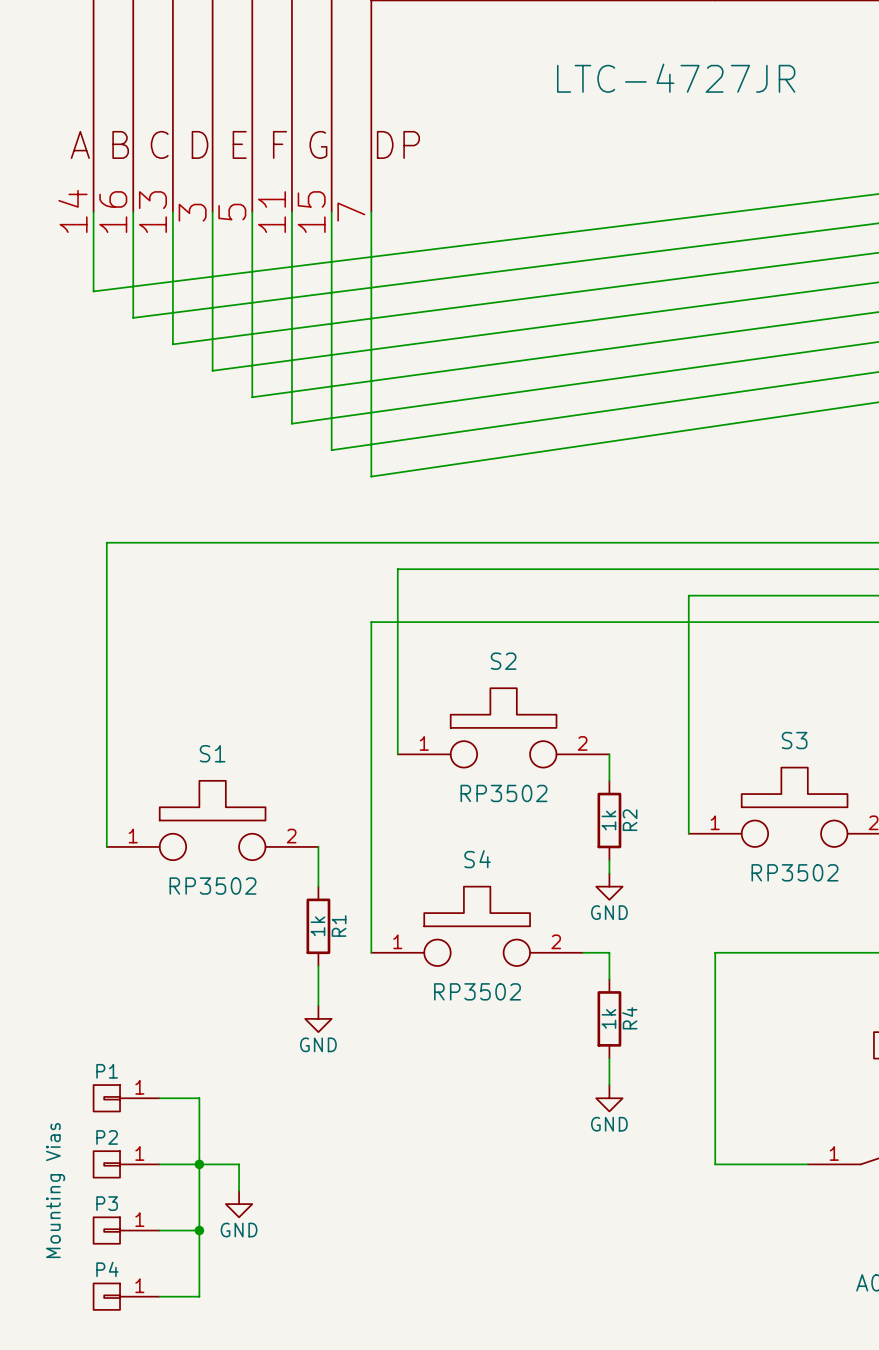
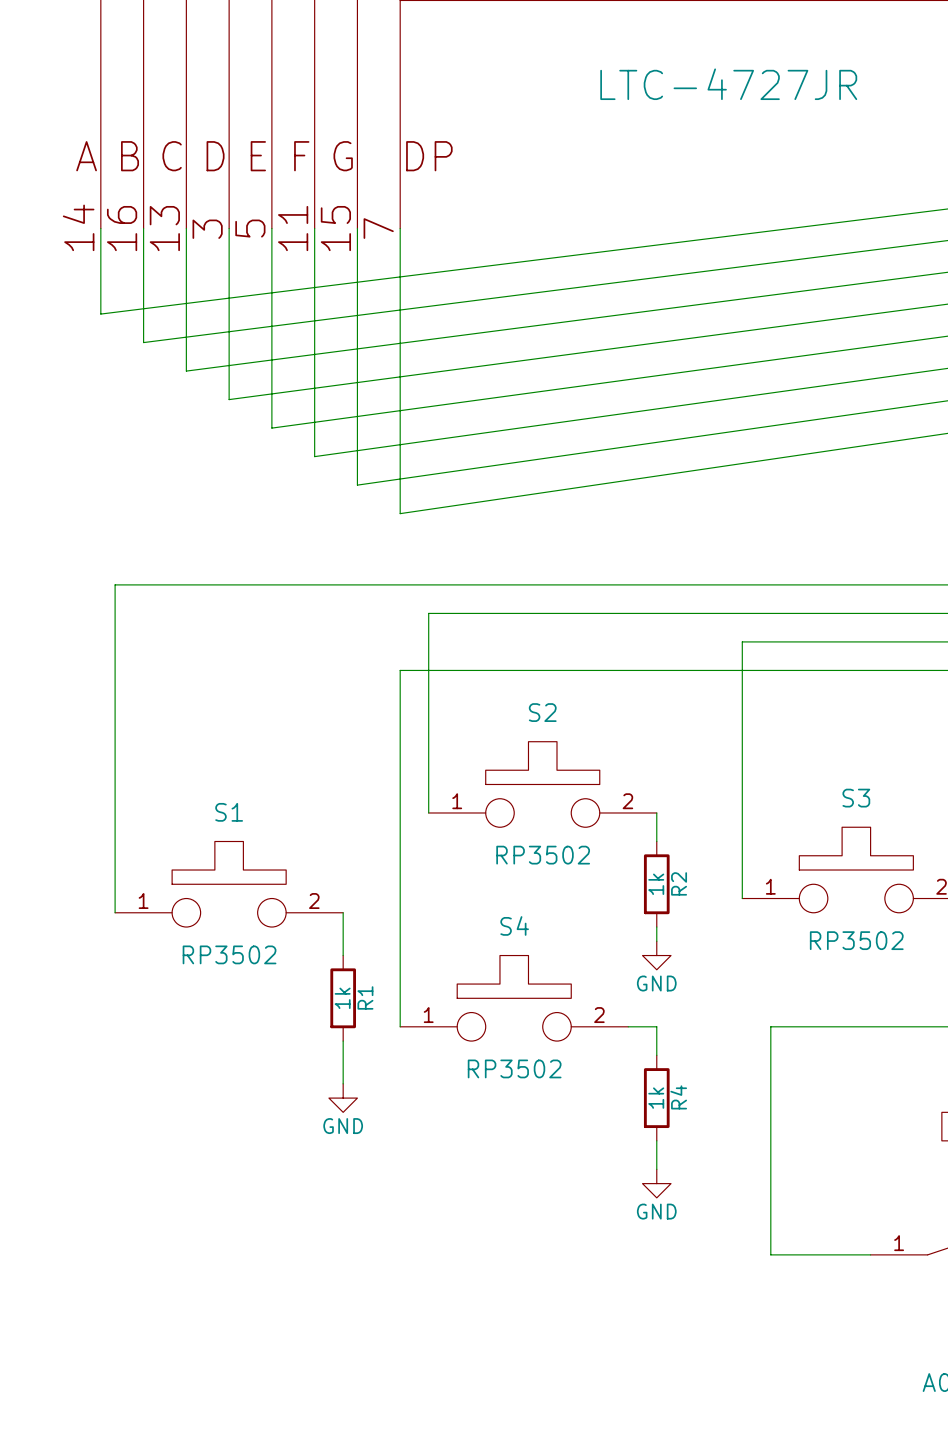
P1: Mounting Vias (126, 1098) -> none
wire: (159, 1098) (199, 1098) (199, 1296) (159, 1296) -> none
P2: (126, 1164) -> none
wire: (159, 1164) (239, 1164) (239, 1190) -> none
junction: (199, 1164) -> none
power symbol: GND (239, 1204) -> none
P3: (126, 1230) -> none
wire: (159, 1230) (199, 1230) -> none
junction: (199, 1230) -> none
P4: (126, 1296) -> none

